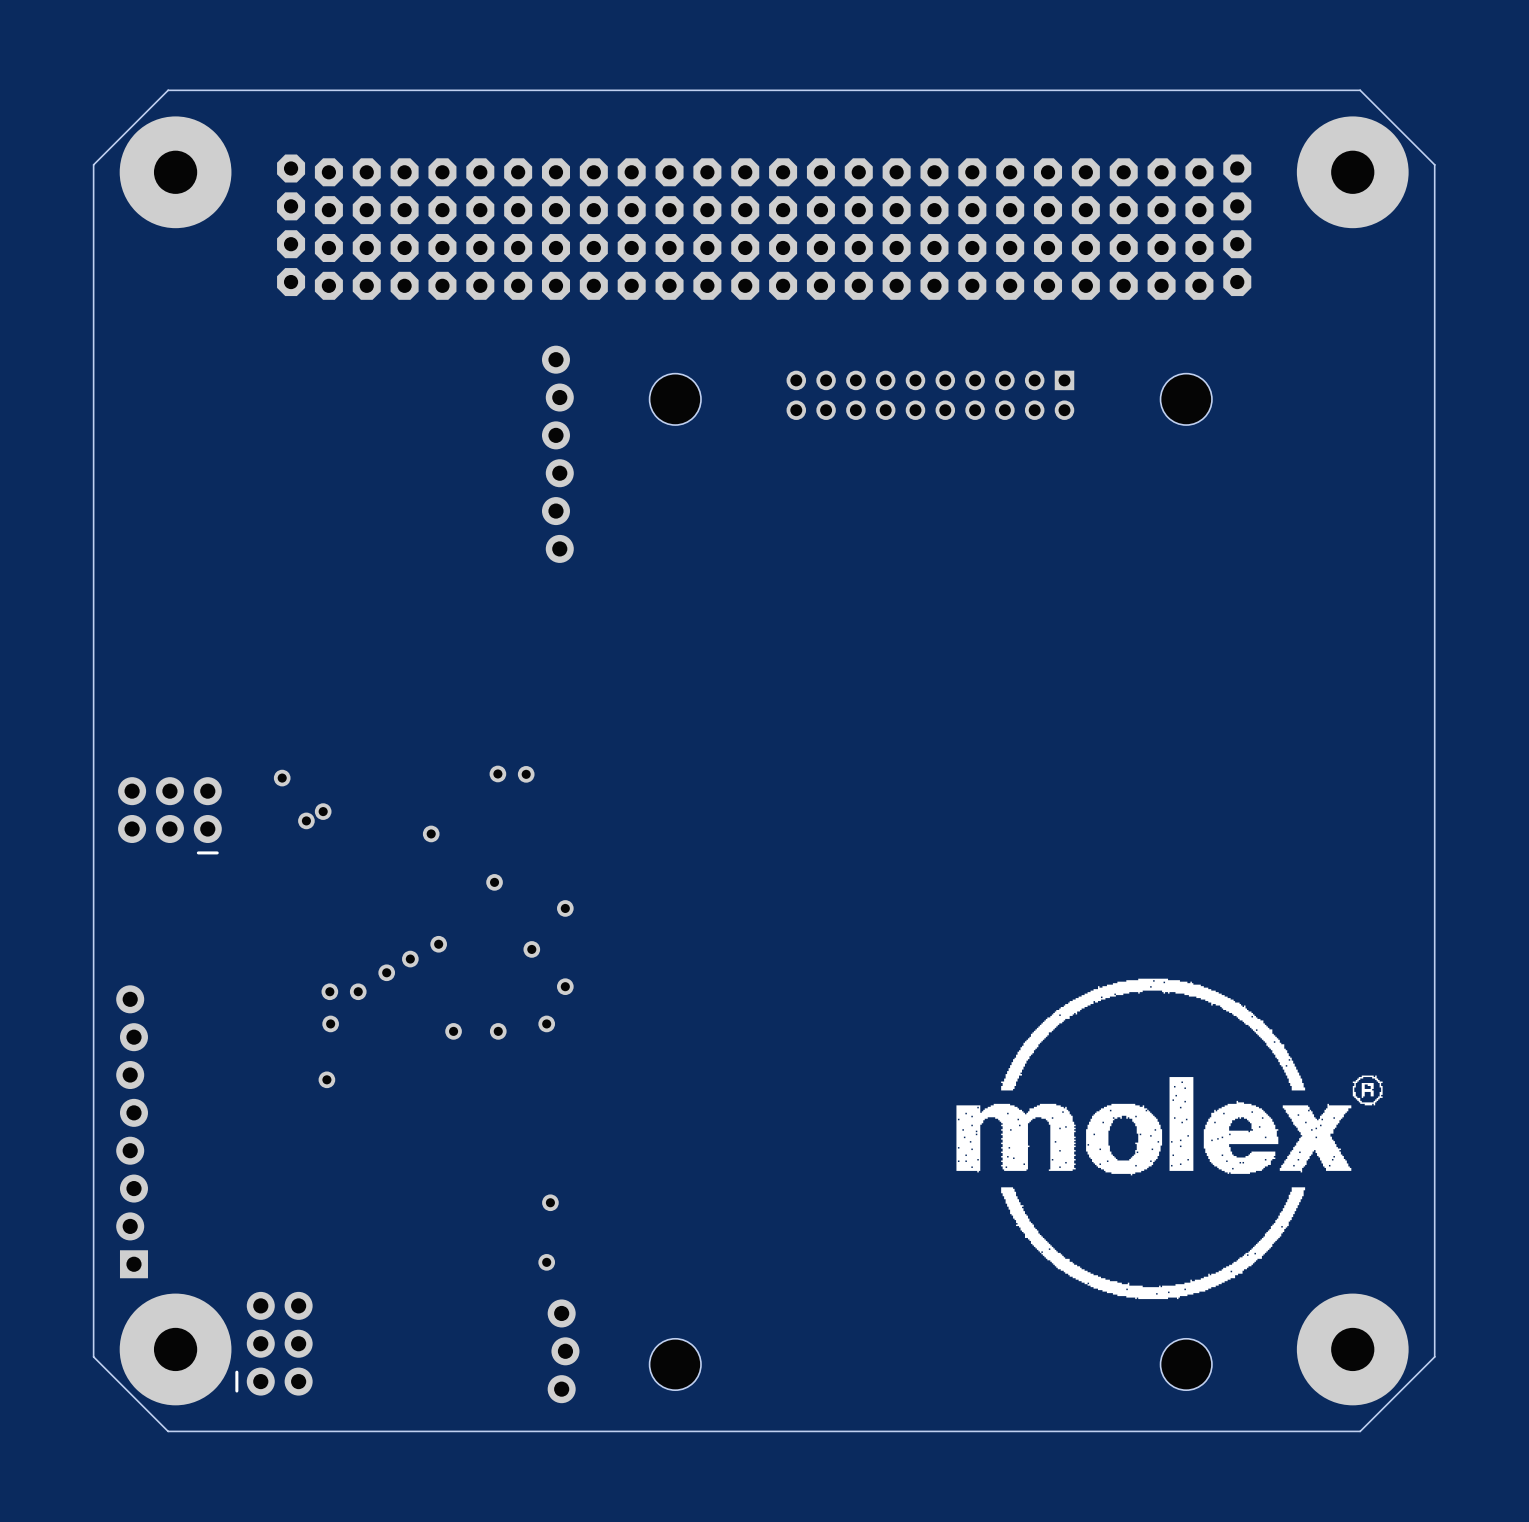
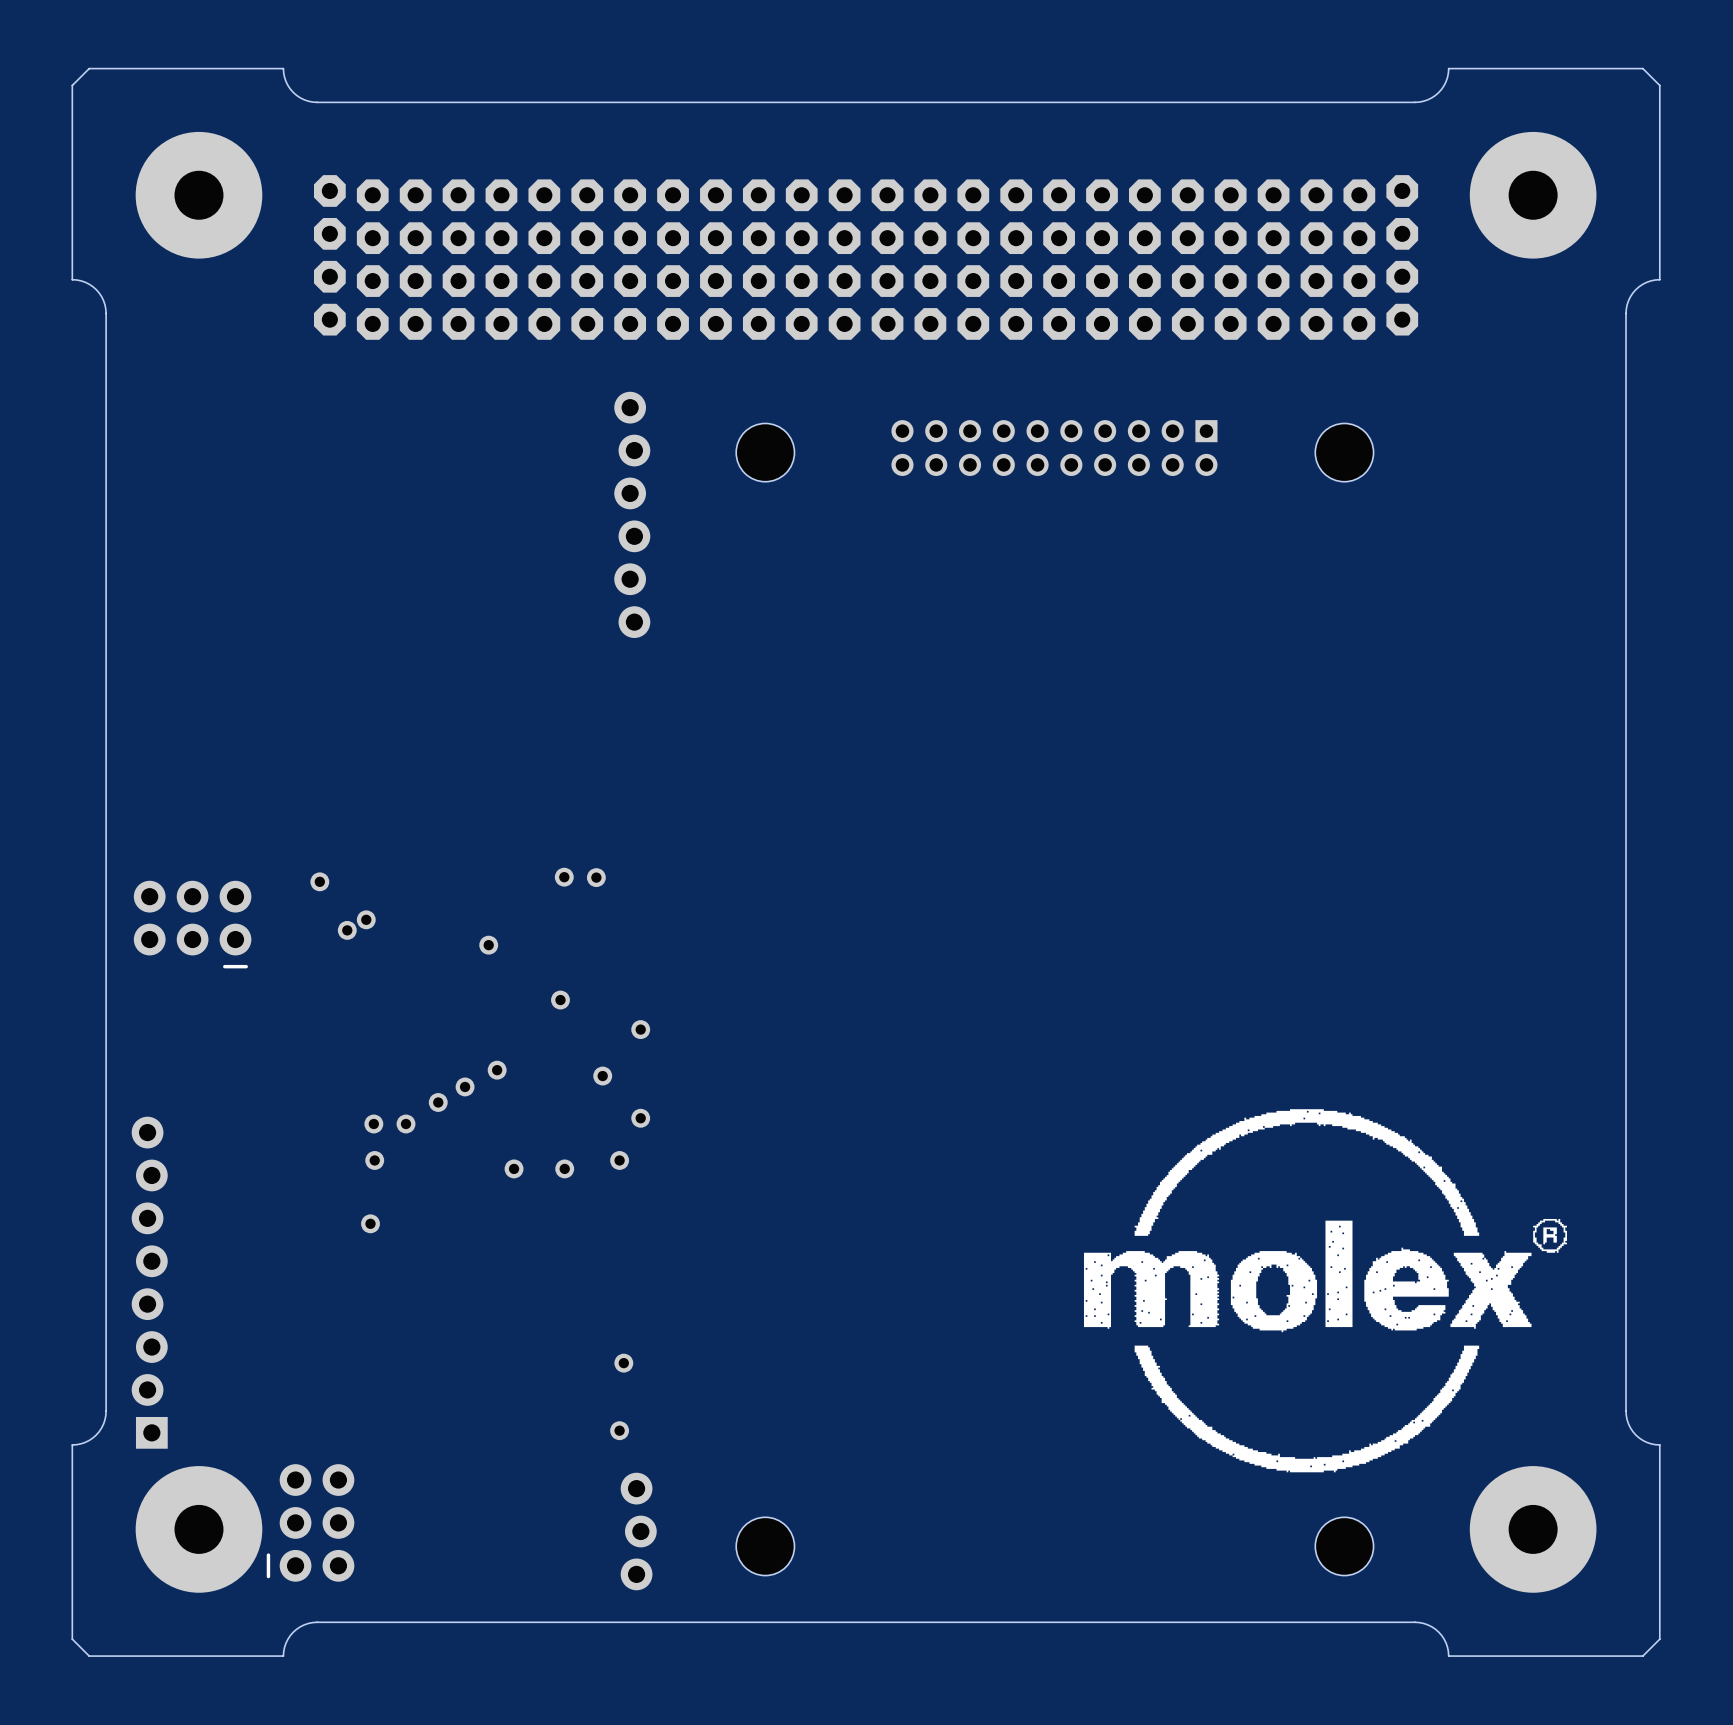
part footprint: [93, 90, 1435, 1432] -> [72, 68, 1660, 1657]

